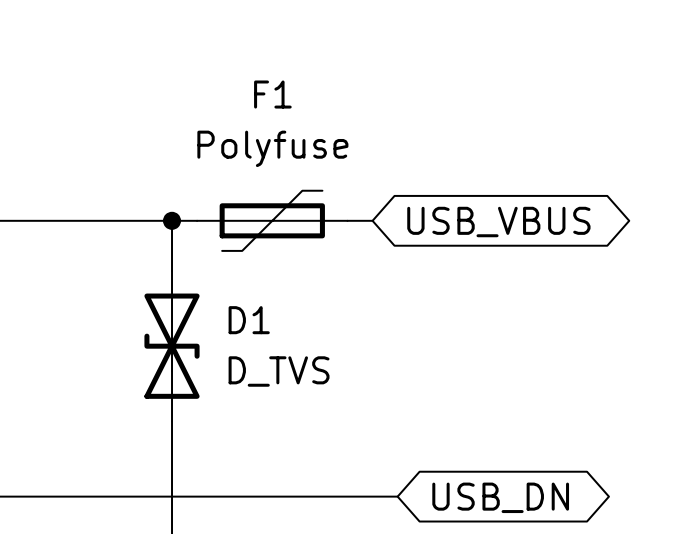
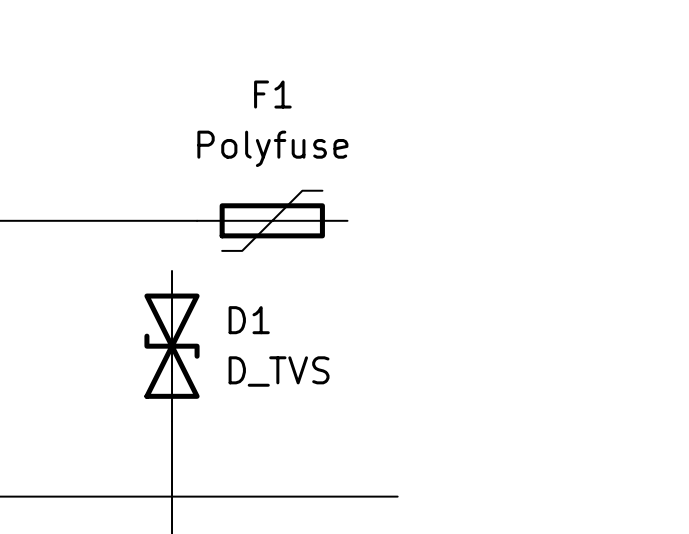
wire: (172, 220) (172, 270) -> none
junction: (172, 220) -> none
wire: (347, 220) (372, 220) -> none
global label: USB_VBUS (498, 222) -> none
global label: USB_DN (500, 497) -> none

